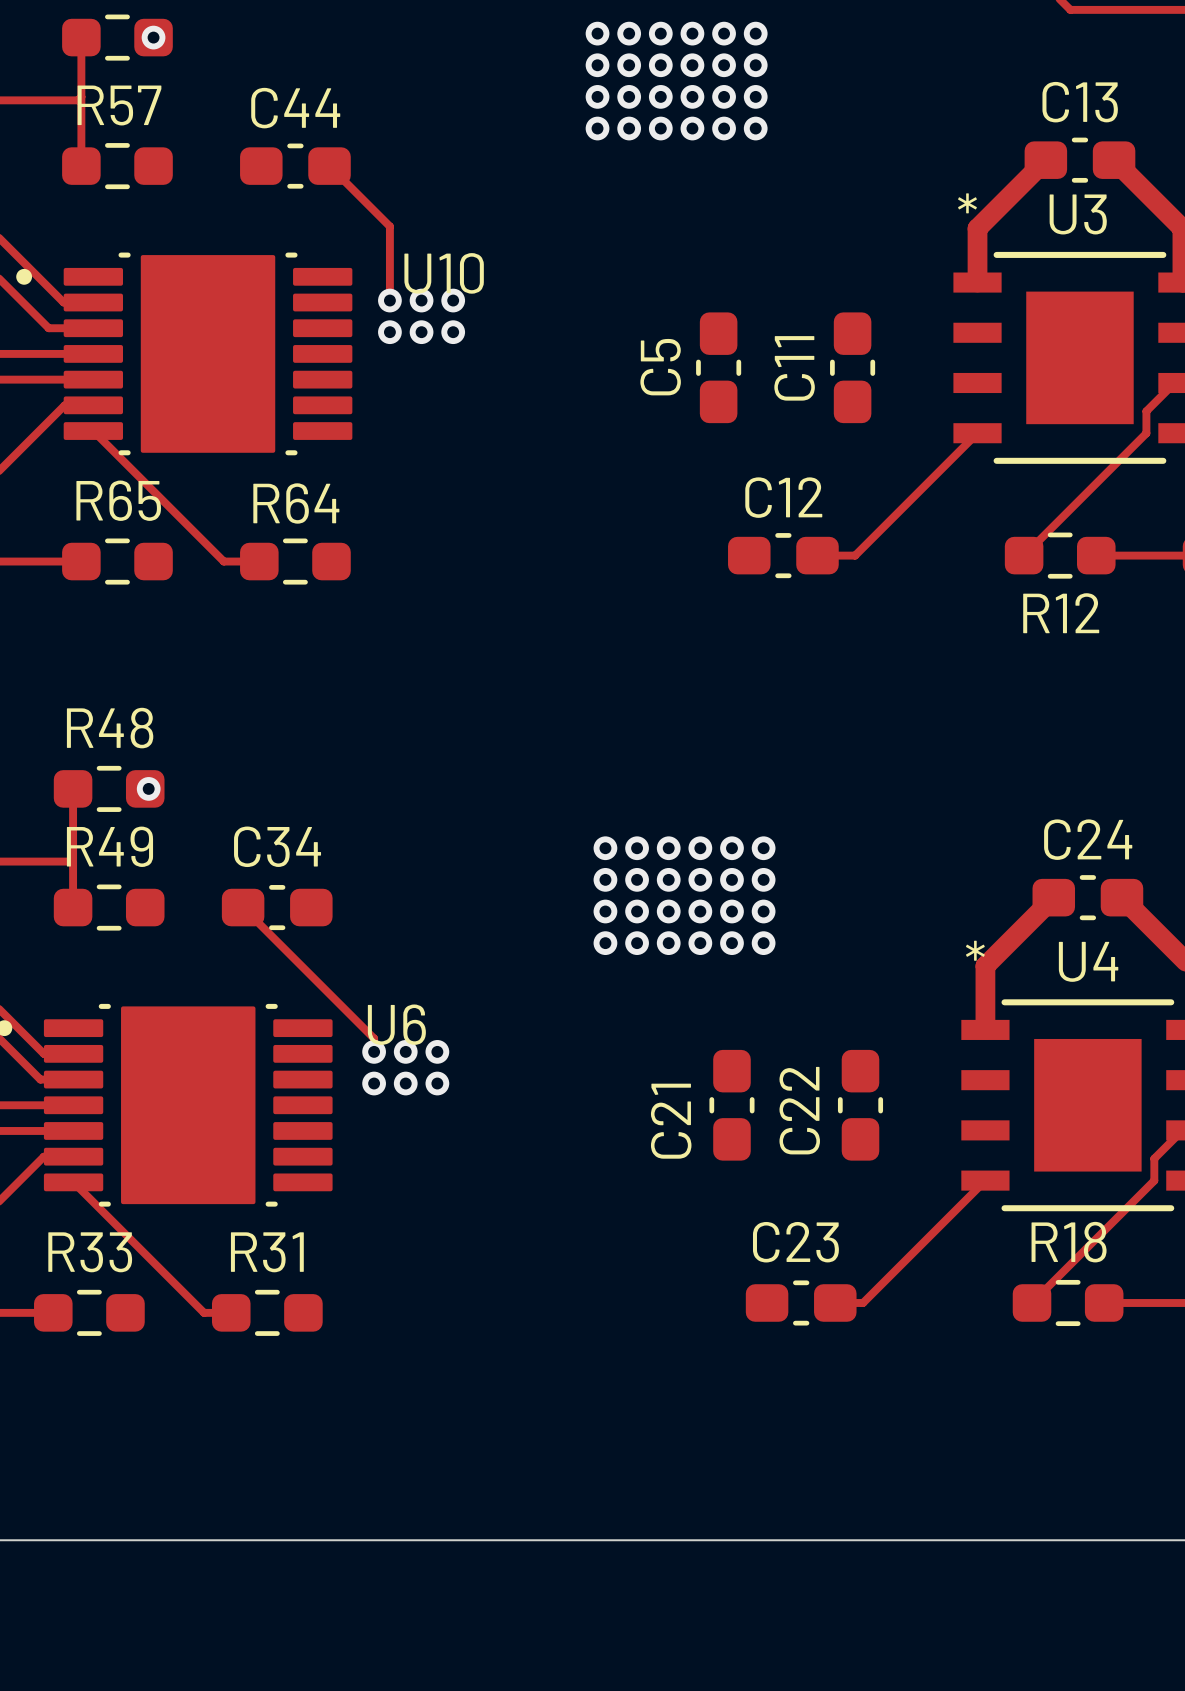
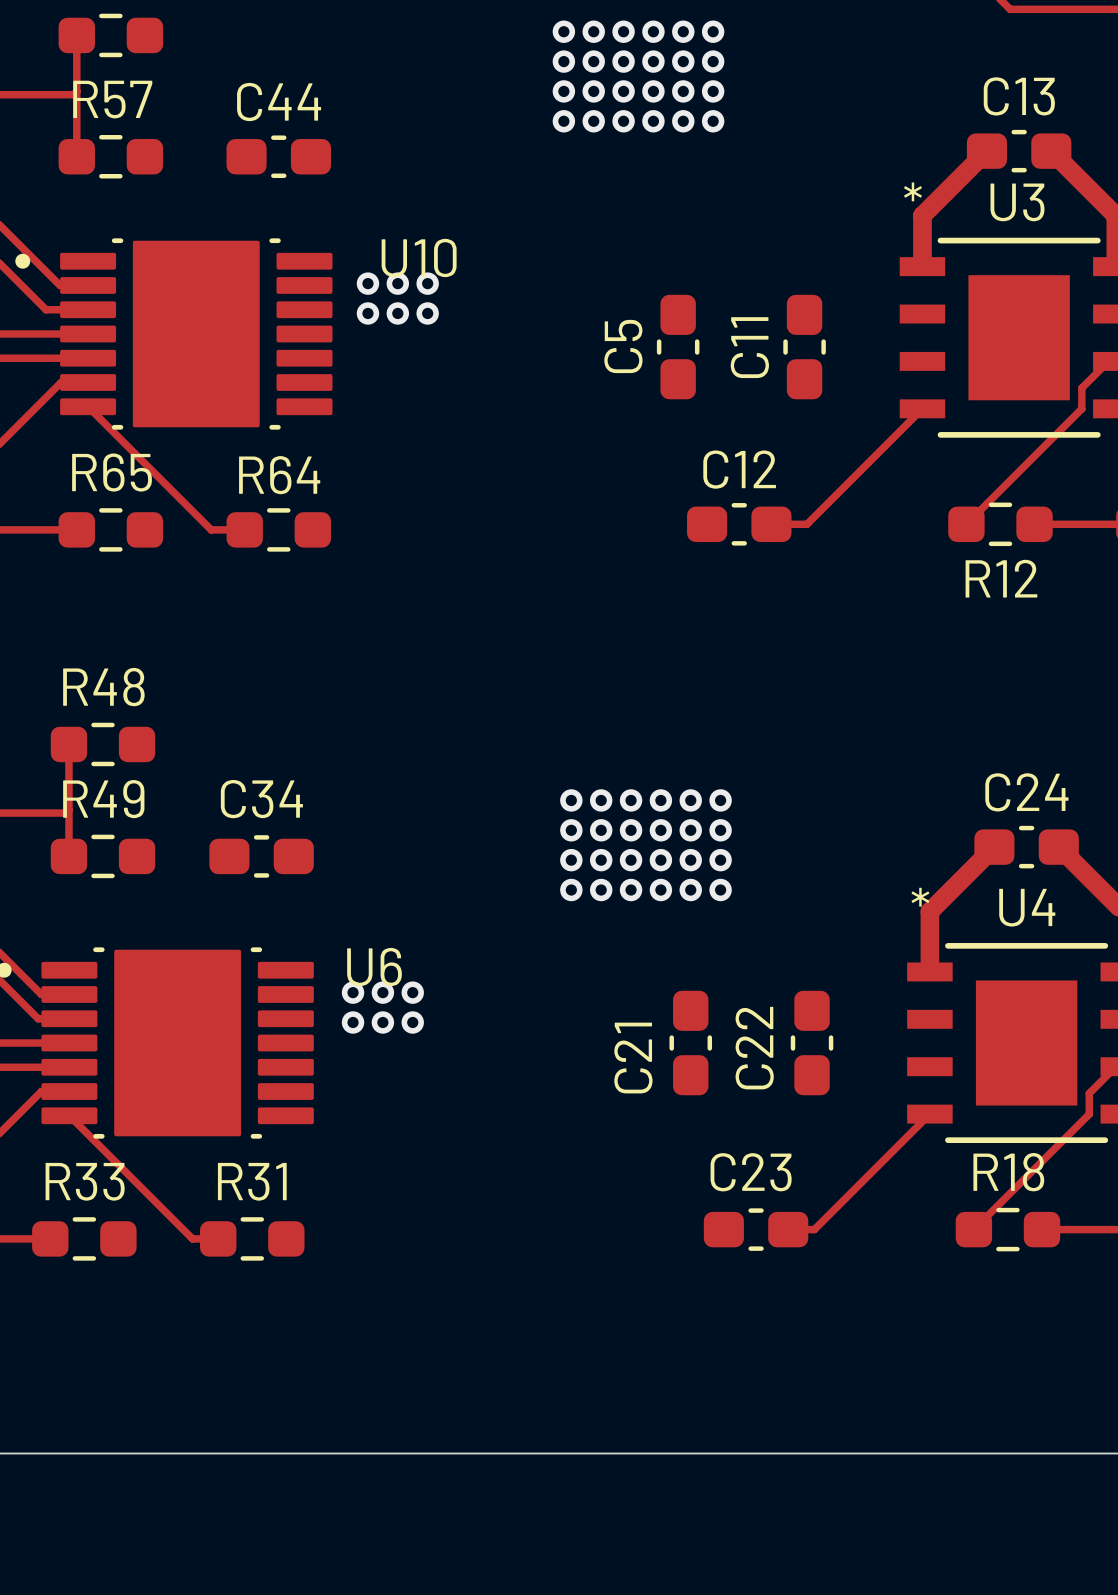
via: (153, 37) -> none
track: (329, 166) (389, 226) (389, 300) -> none
via: (148, 788) -> none
track: (243, 907) (374, 1038) (374, 1051) -> none

